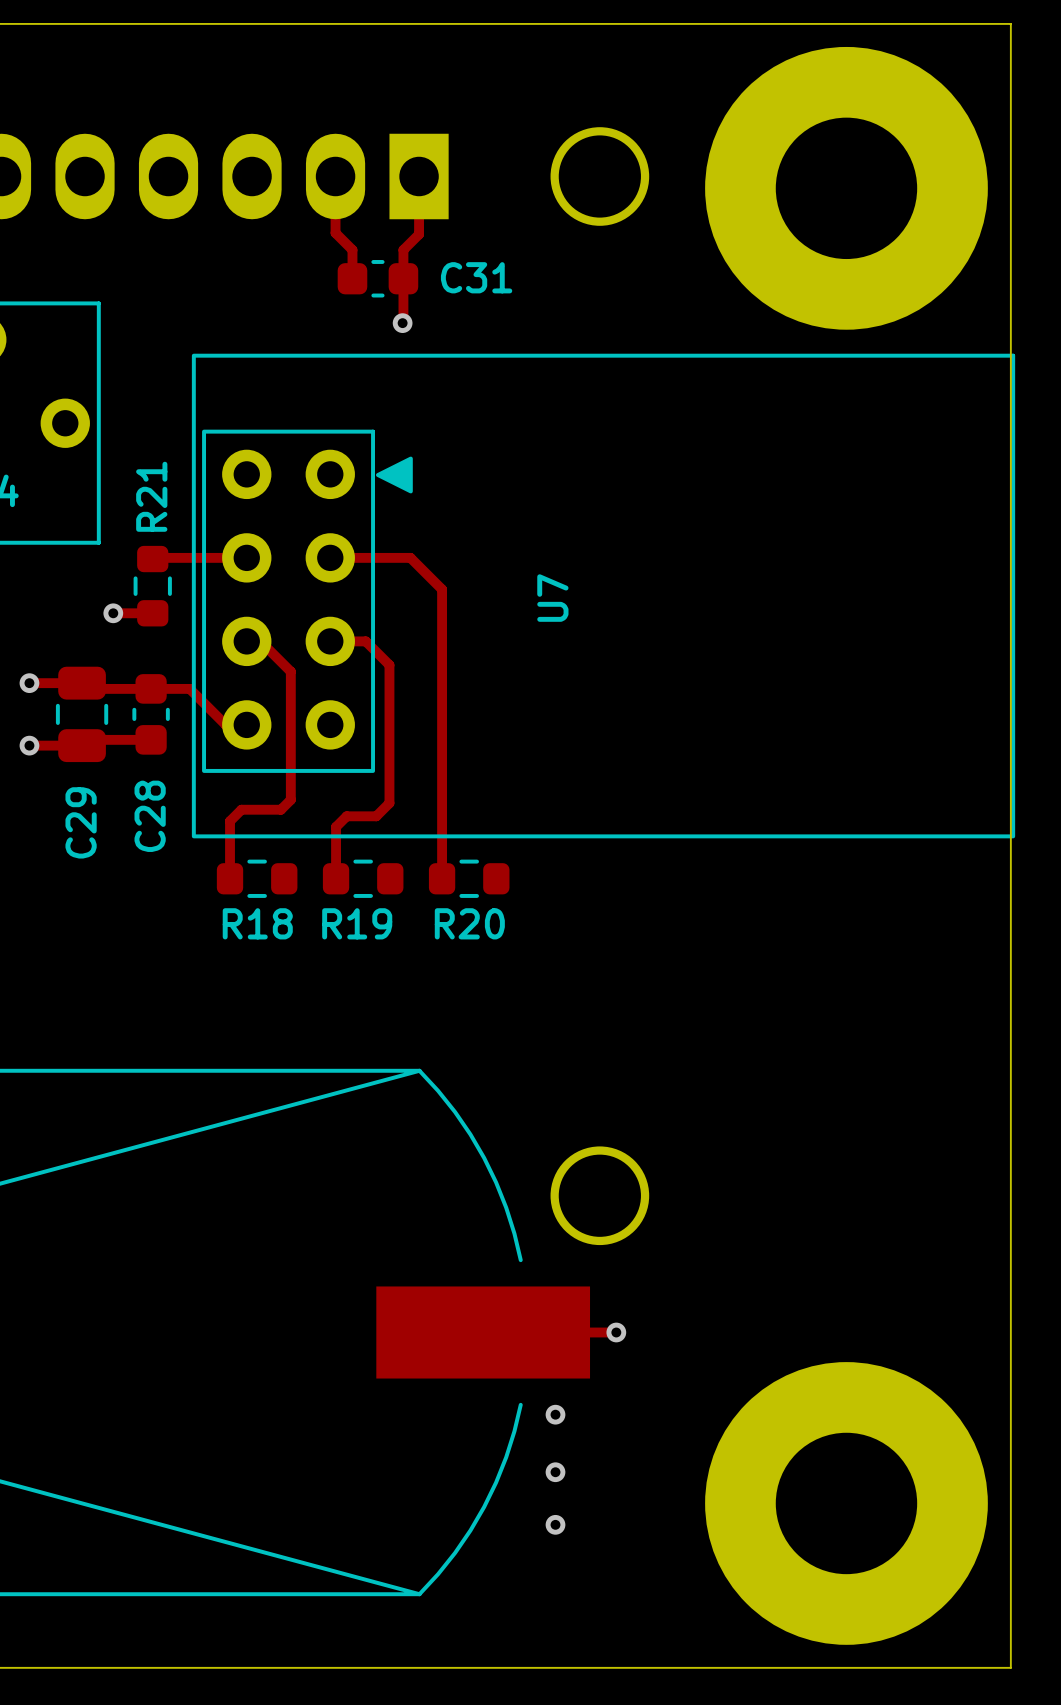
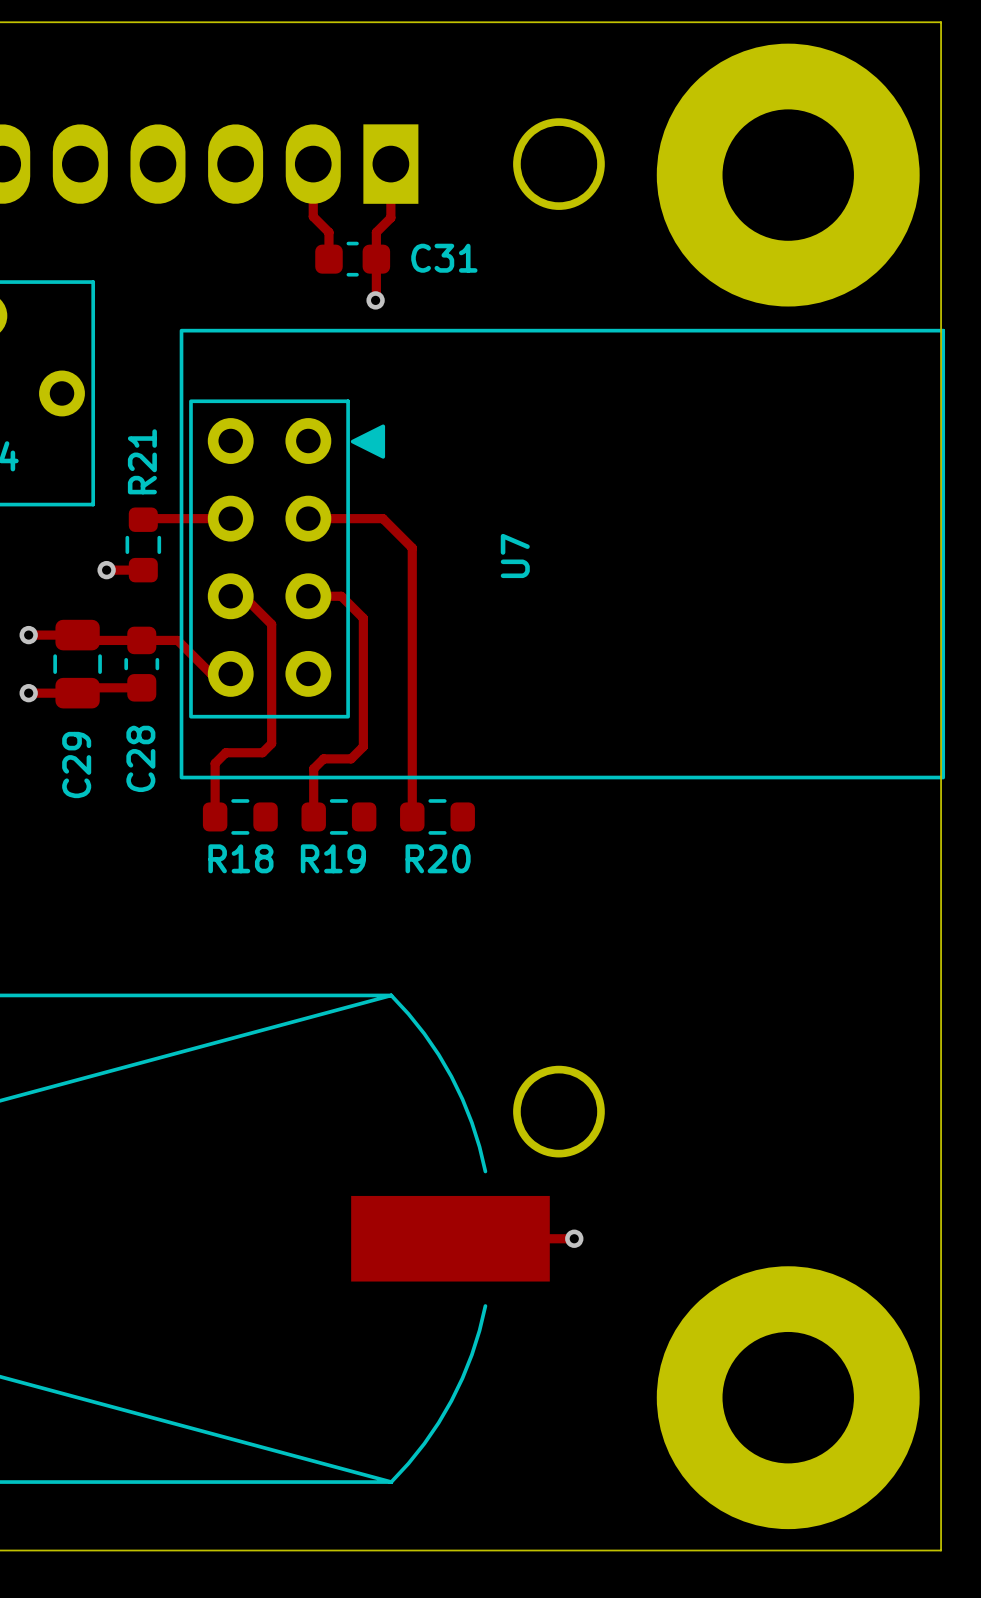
via: (555, 1414) -> none
via: (555, 1472) -> none
via: (555, 1524) -> none

